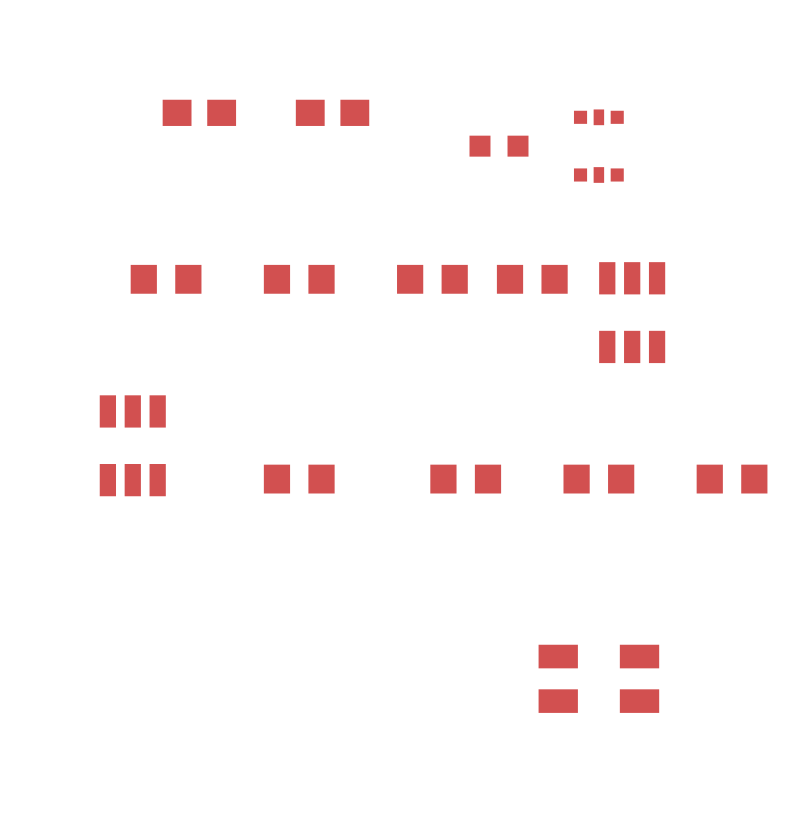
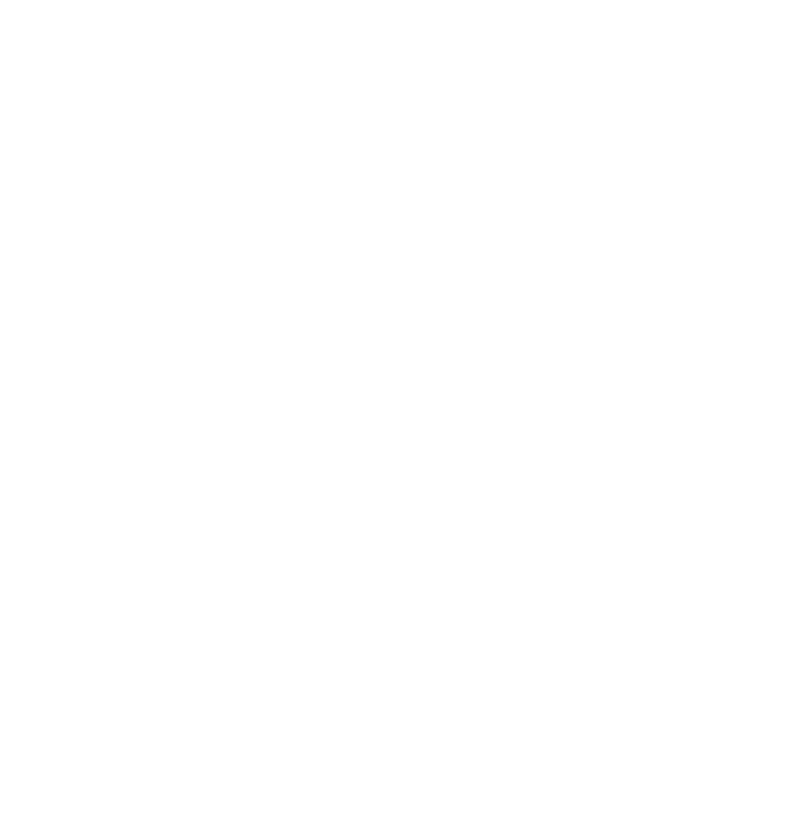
part: (199, 112) -> none
part: (332, 112) -> none
part: (498, 146) -> none
part: (598, 146) -> none
part: (166, 279) -> none
part: (299, 279) -> none
part: (432, 279) -> none
part: (532, 279) -> none
part: (632, 312) -> none
part: (132, 445) -> none
part: (299, 479) -> none
part: (465, 479) -> none
part: (598, 479) -> none
part: (732, 479) -> none
part: (598, 678) -> none

